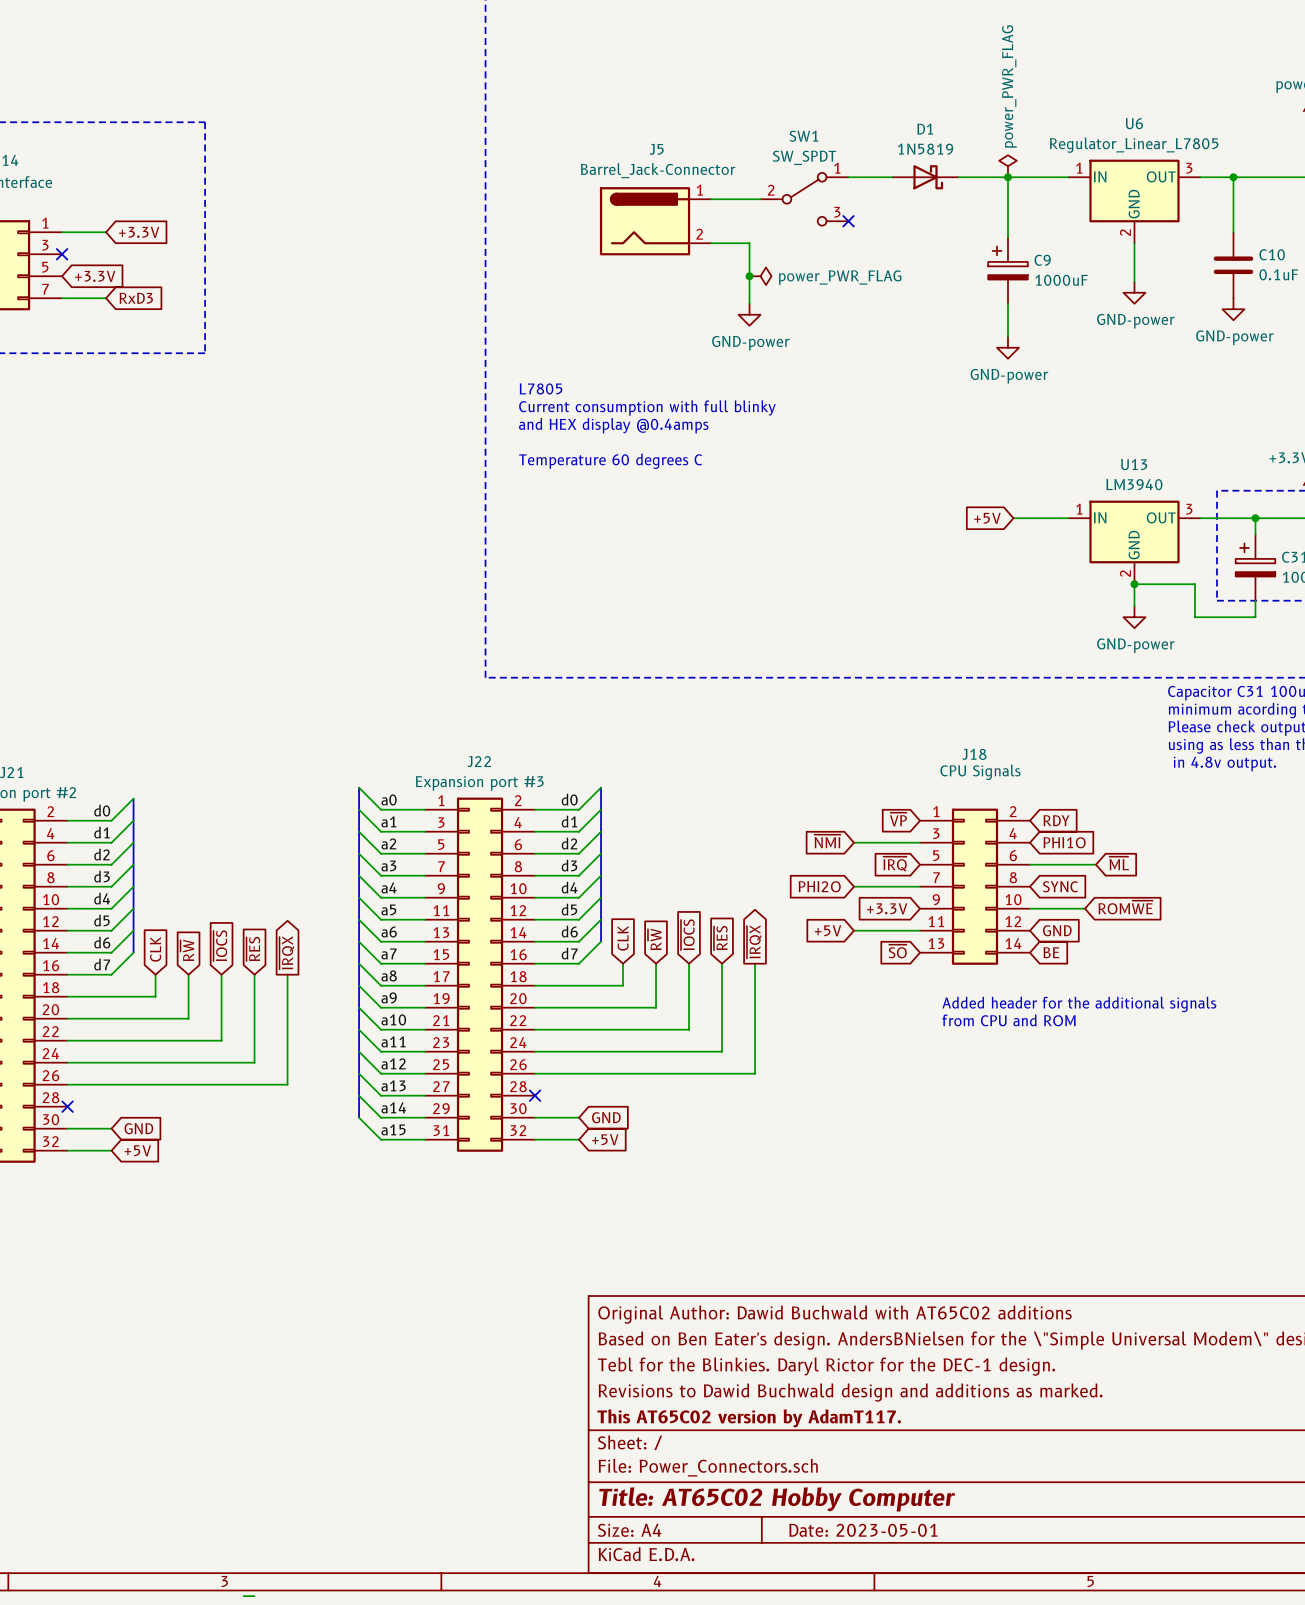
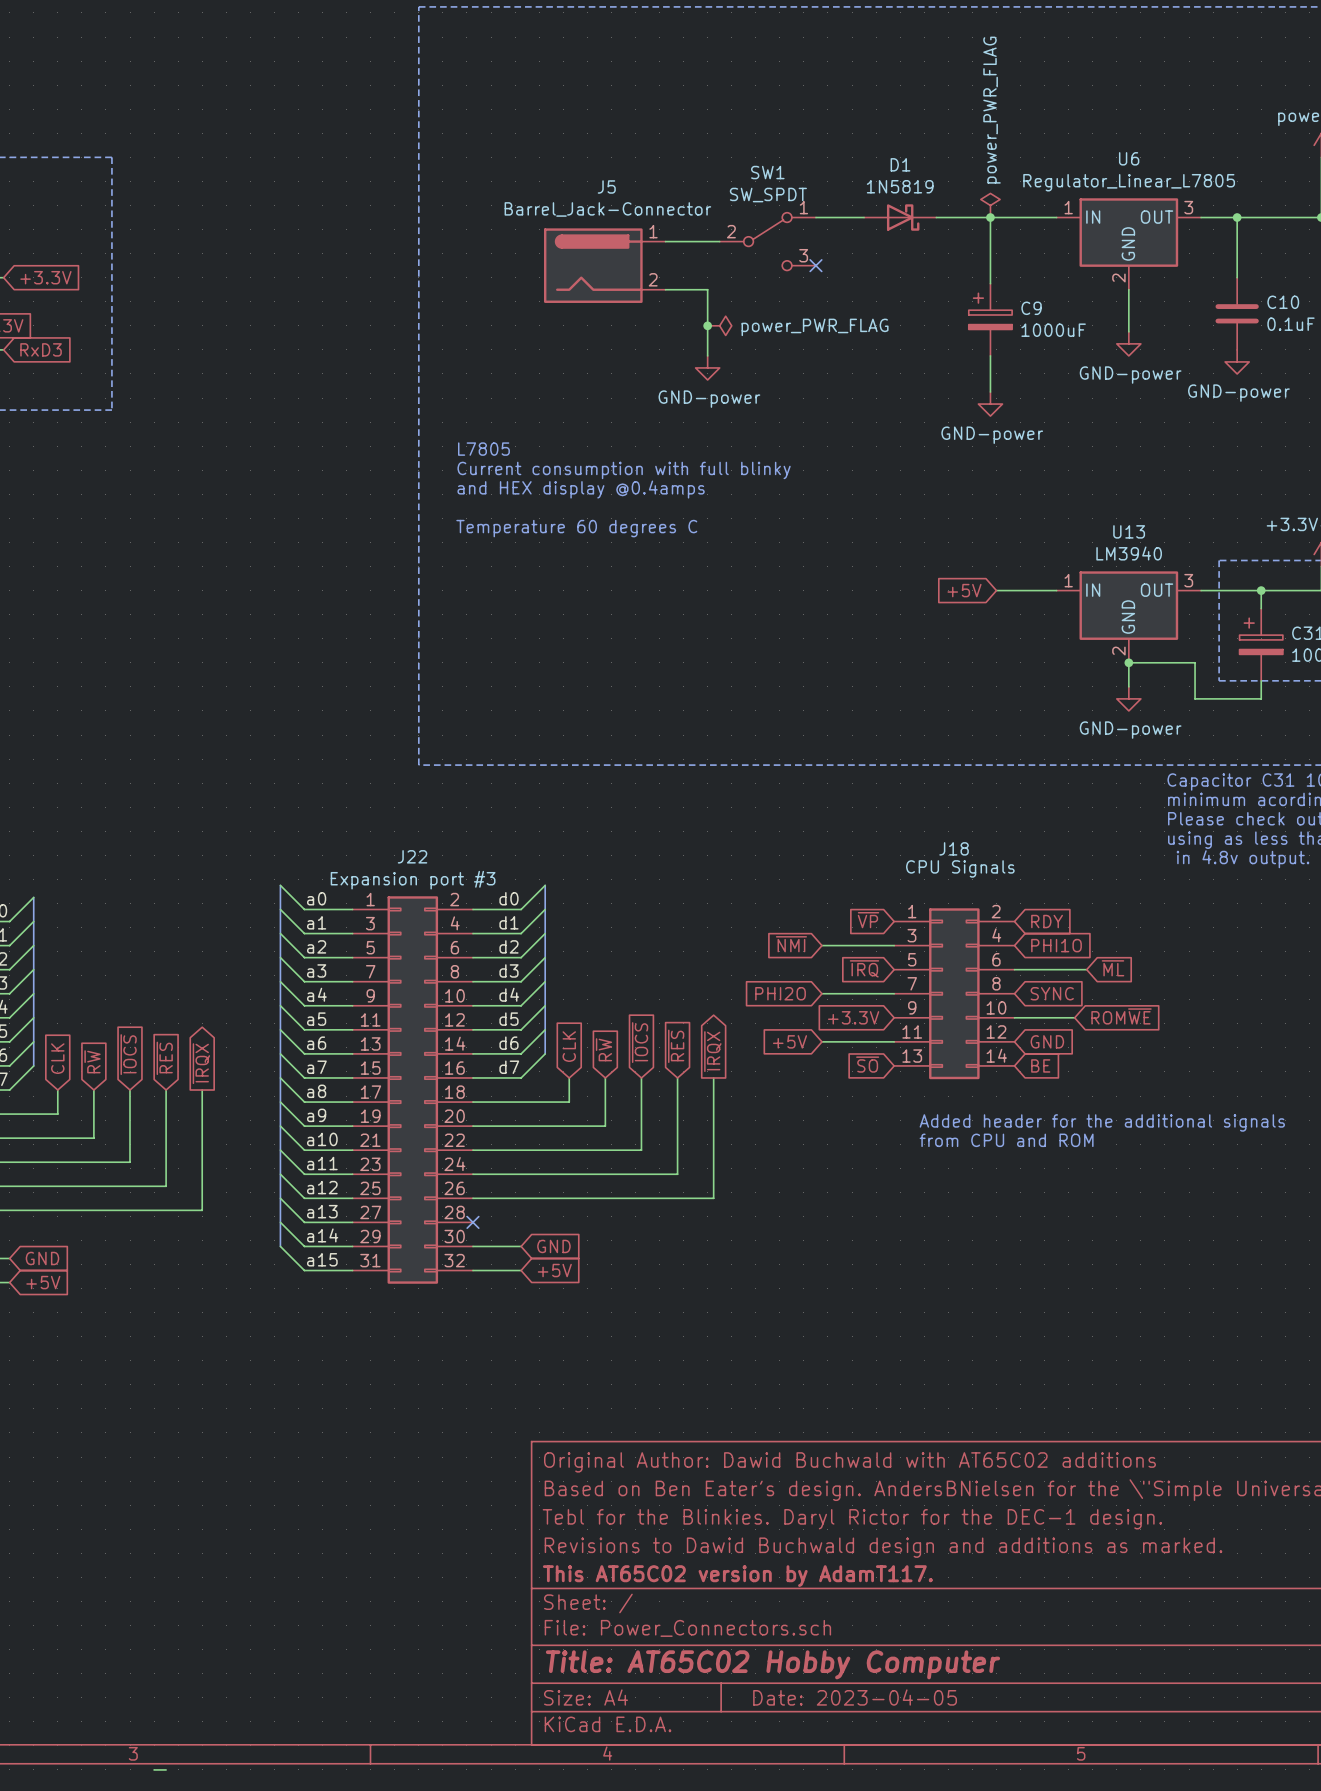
title block: Date: 2023-05-01 (863, 1530) -> Date: 2023-04-05 (855, 1697)

